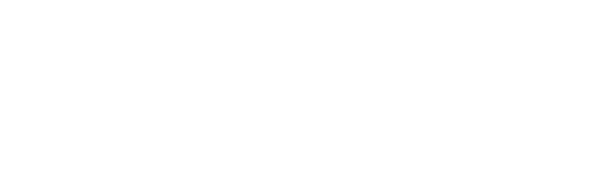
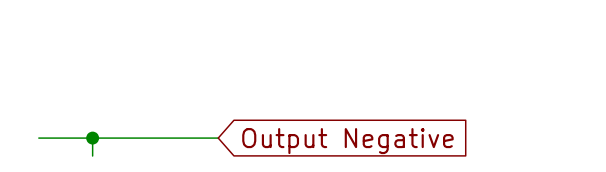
wire: none -> (38, 138) (218, 138)
wire: none -> (92, 138) (92, 156)
junction: none -> (92, 138)
global label: none -> Output Negative (347, 141)

